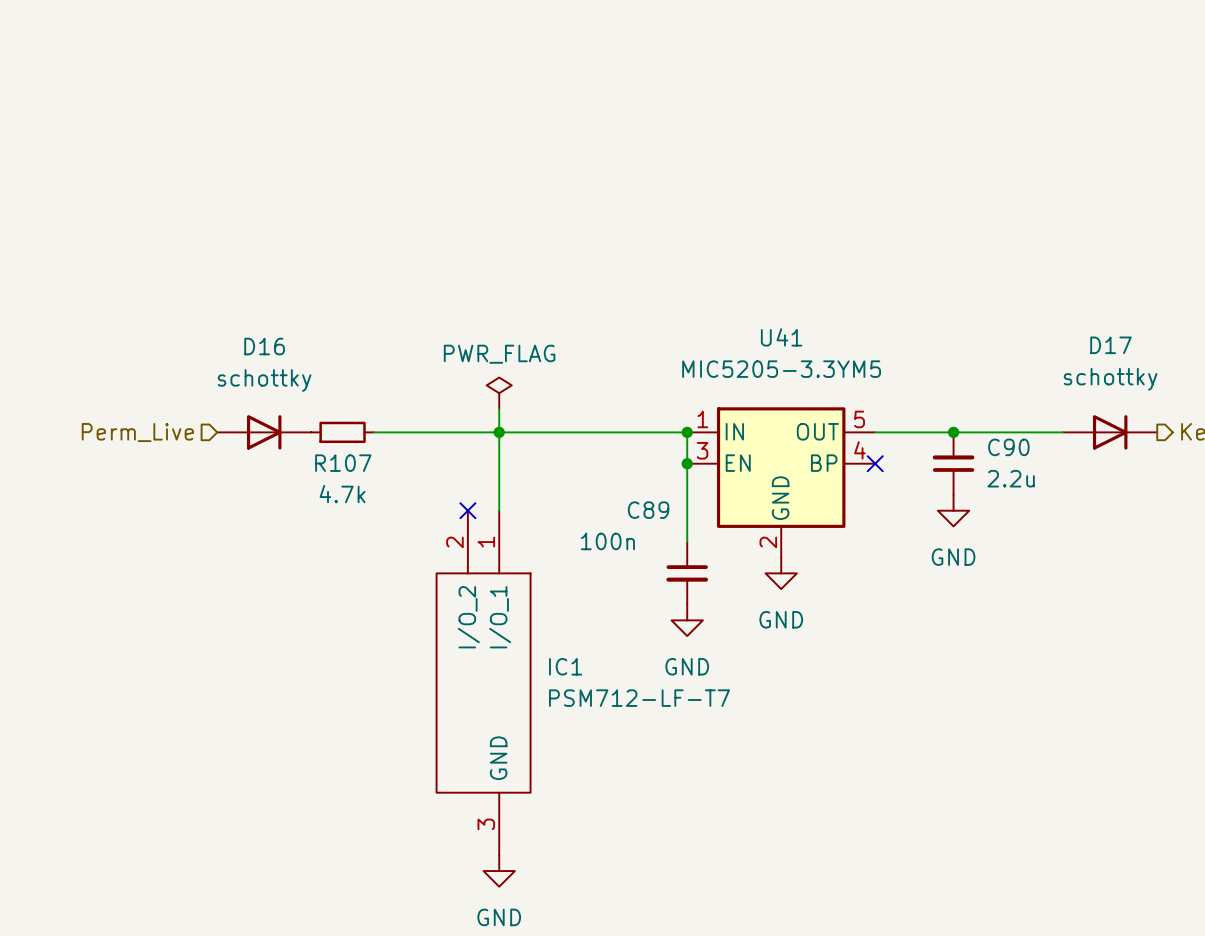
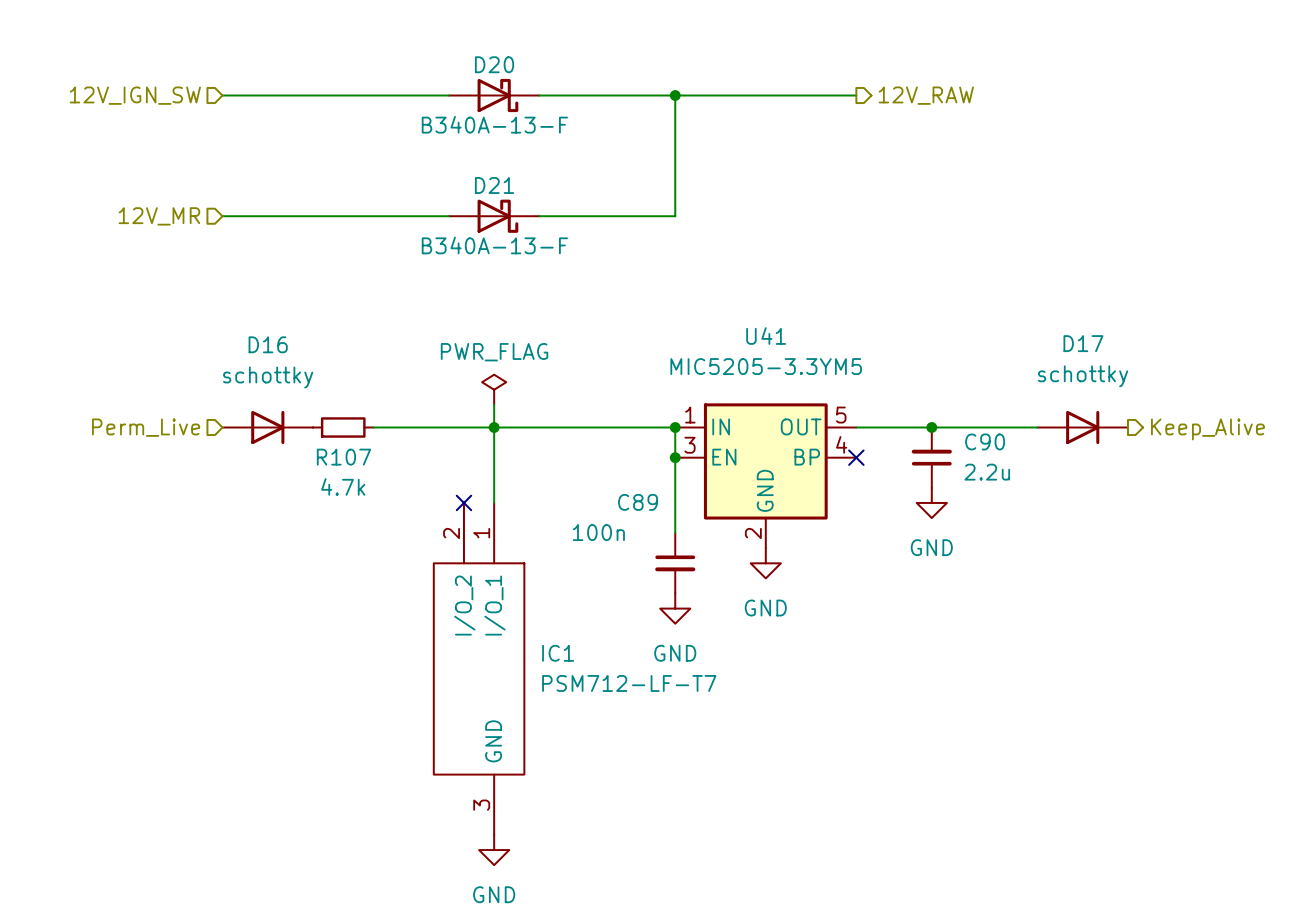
hierarchical label: none -> 12V_IGN_SW (135, 95)
wire: none -> (222, 95) (448, 95)
D20: none -> B340A-13-F (494, 95)
wire: none -> (539, 95) (856, 95)
wire: none -> (675, 95) (675, 216) (539, 216)
junction: none -> (675, 95)
hierarchical label: none -> 12V_RAW (926, 95)
hierarchical label: none -> 12V_MR (159, 216)
wire: none -> (222, 216) (448, 216)
D21: none -> B340A-13-F (494, 216)

